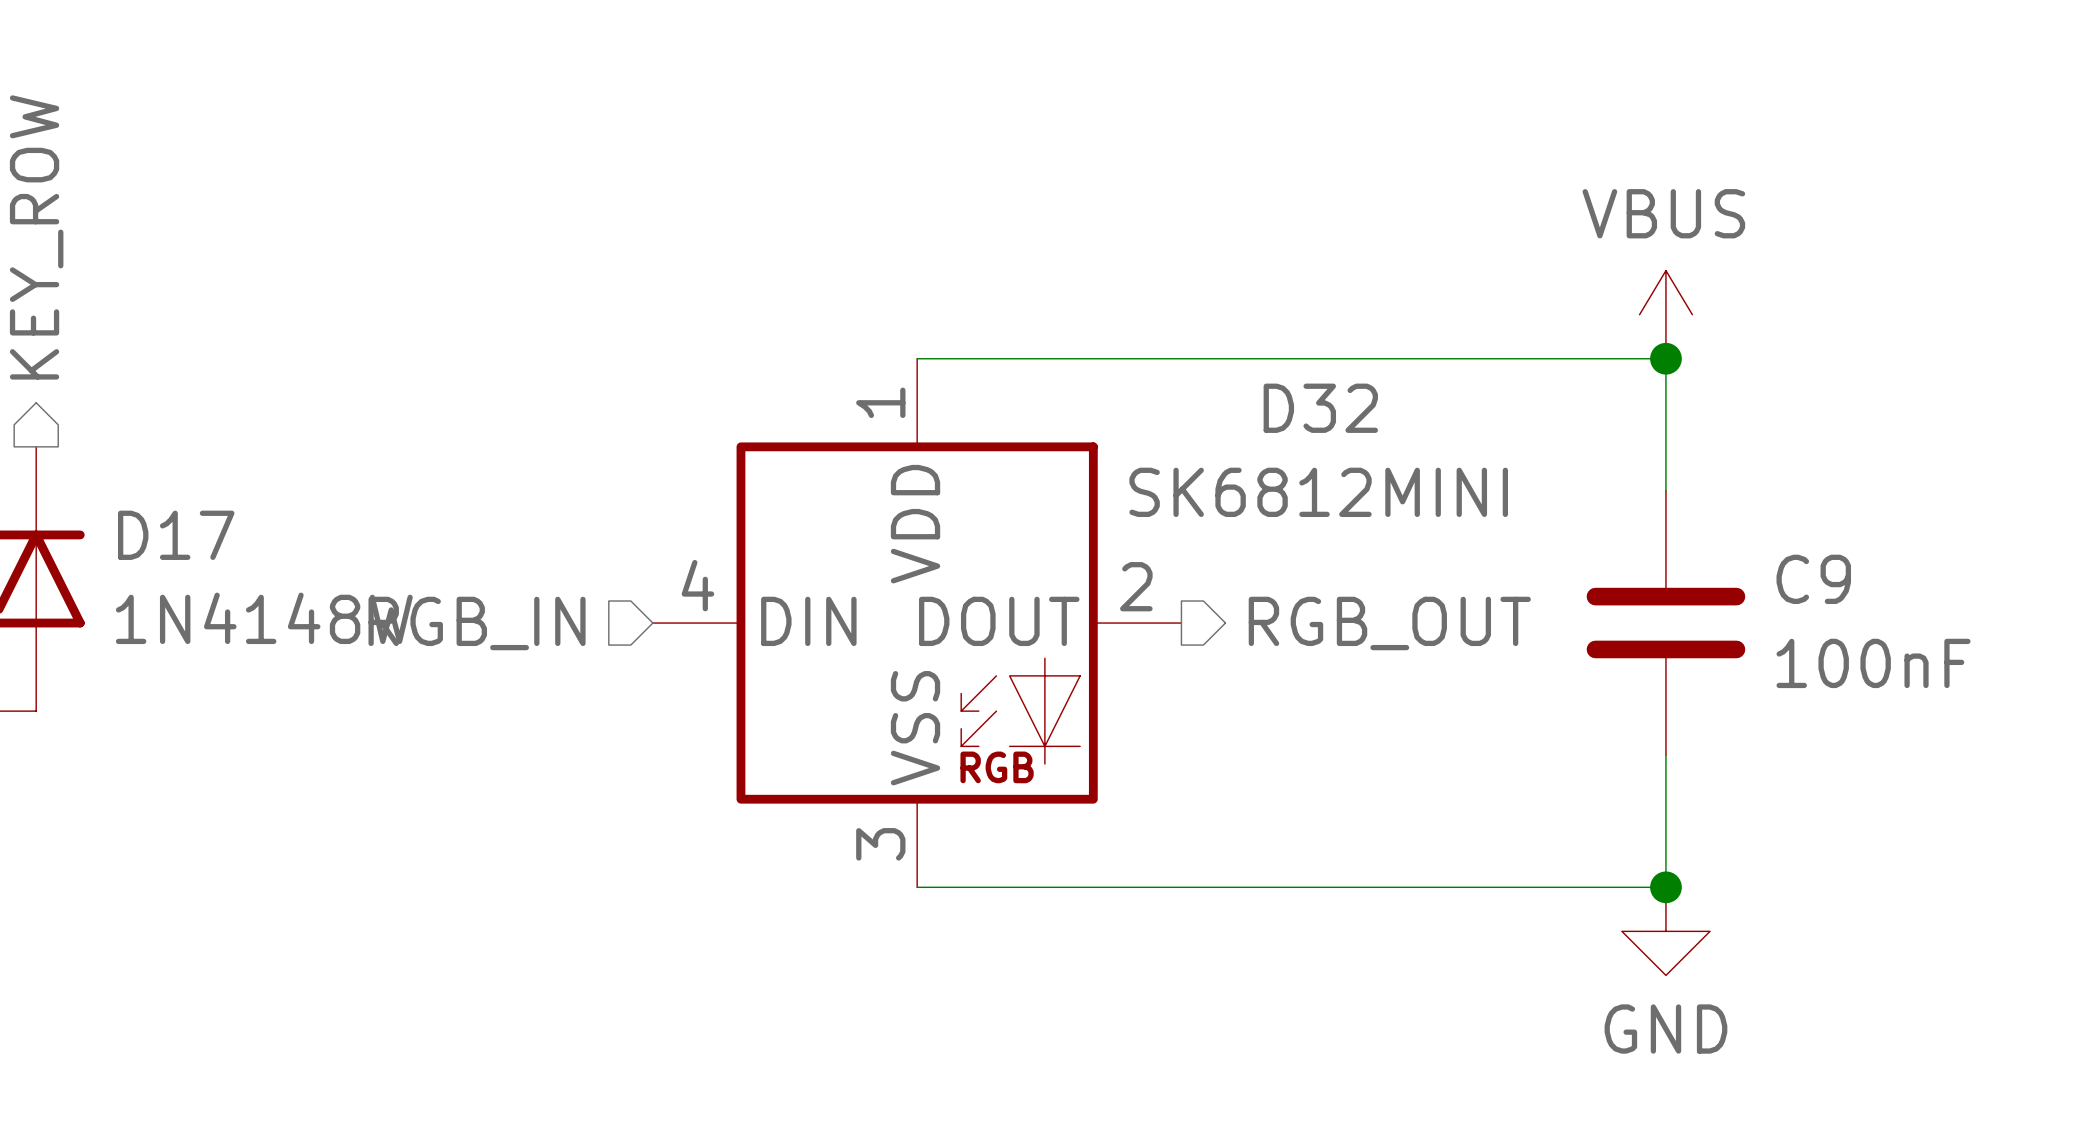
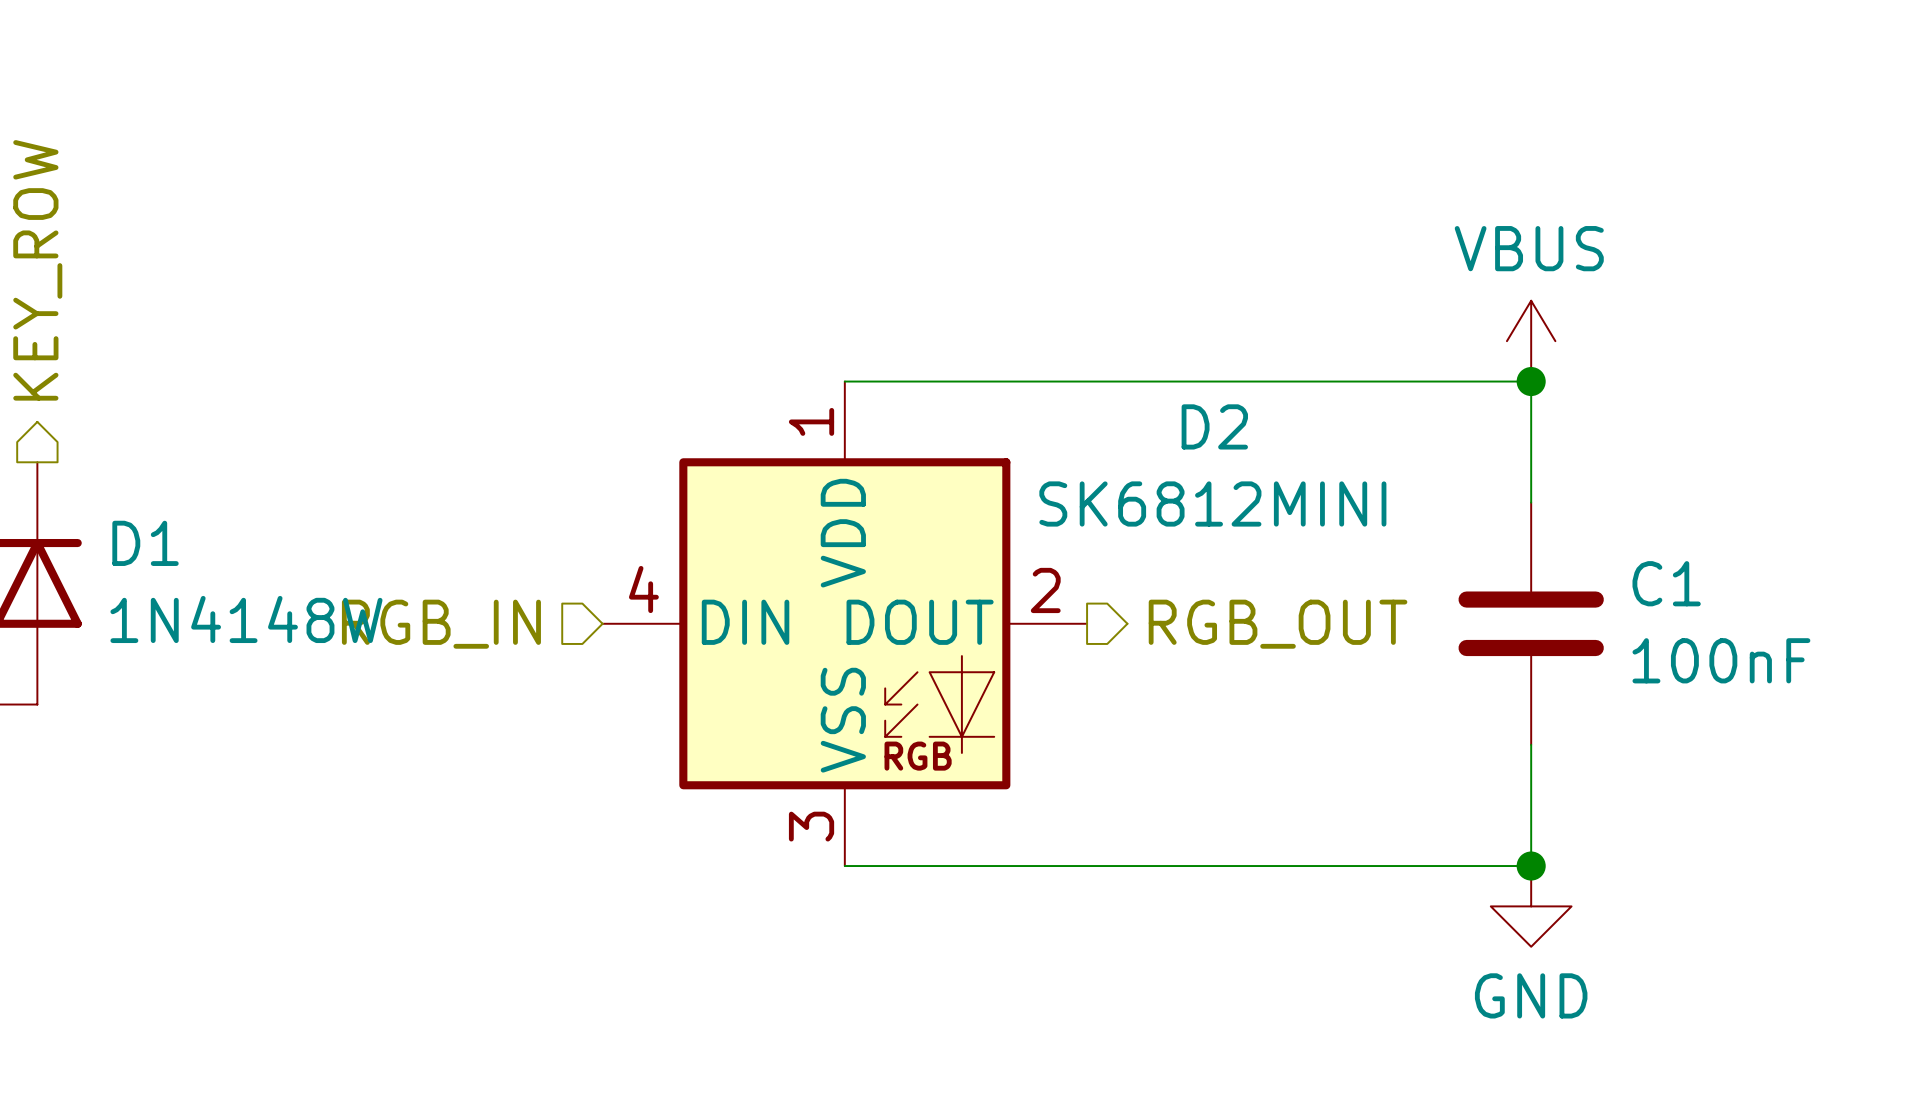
D32 name: D32 (1320, 408) -> D2 (1214, 426)
D17 name: D17 (176, 535) -> D1 (145, 543)
C9 name: C9 (1813, 579) -> C1 (1666, 583)

